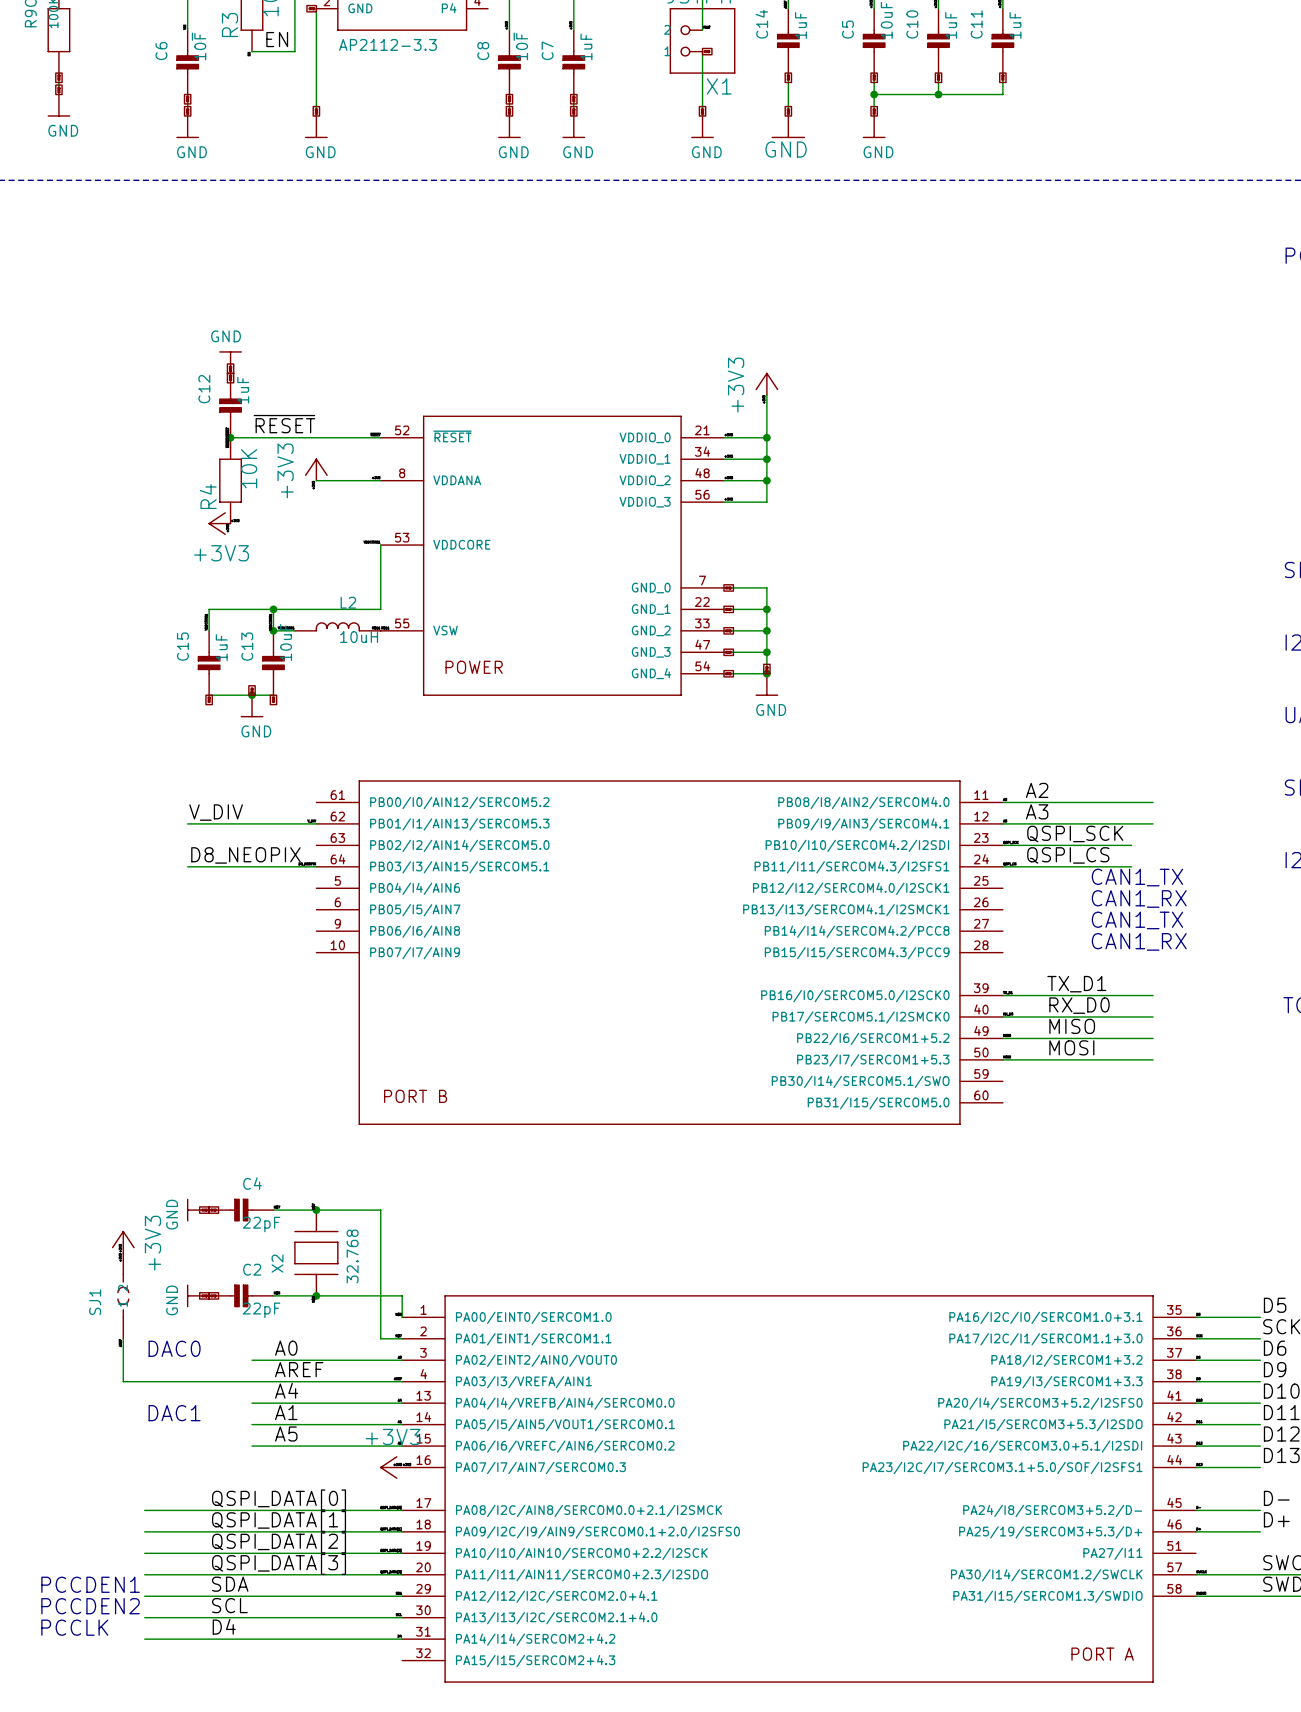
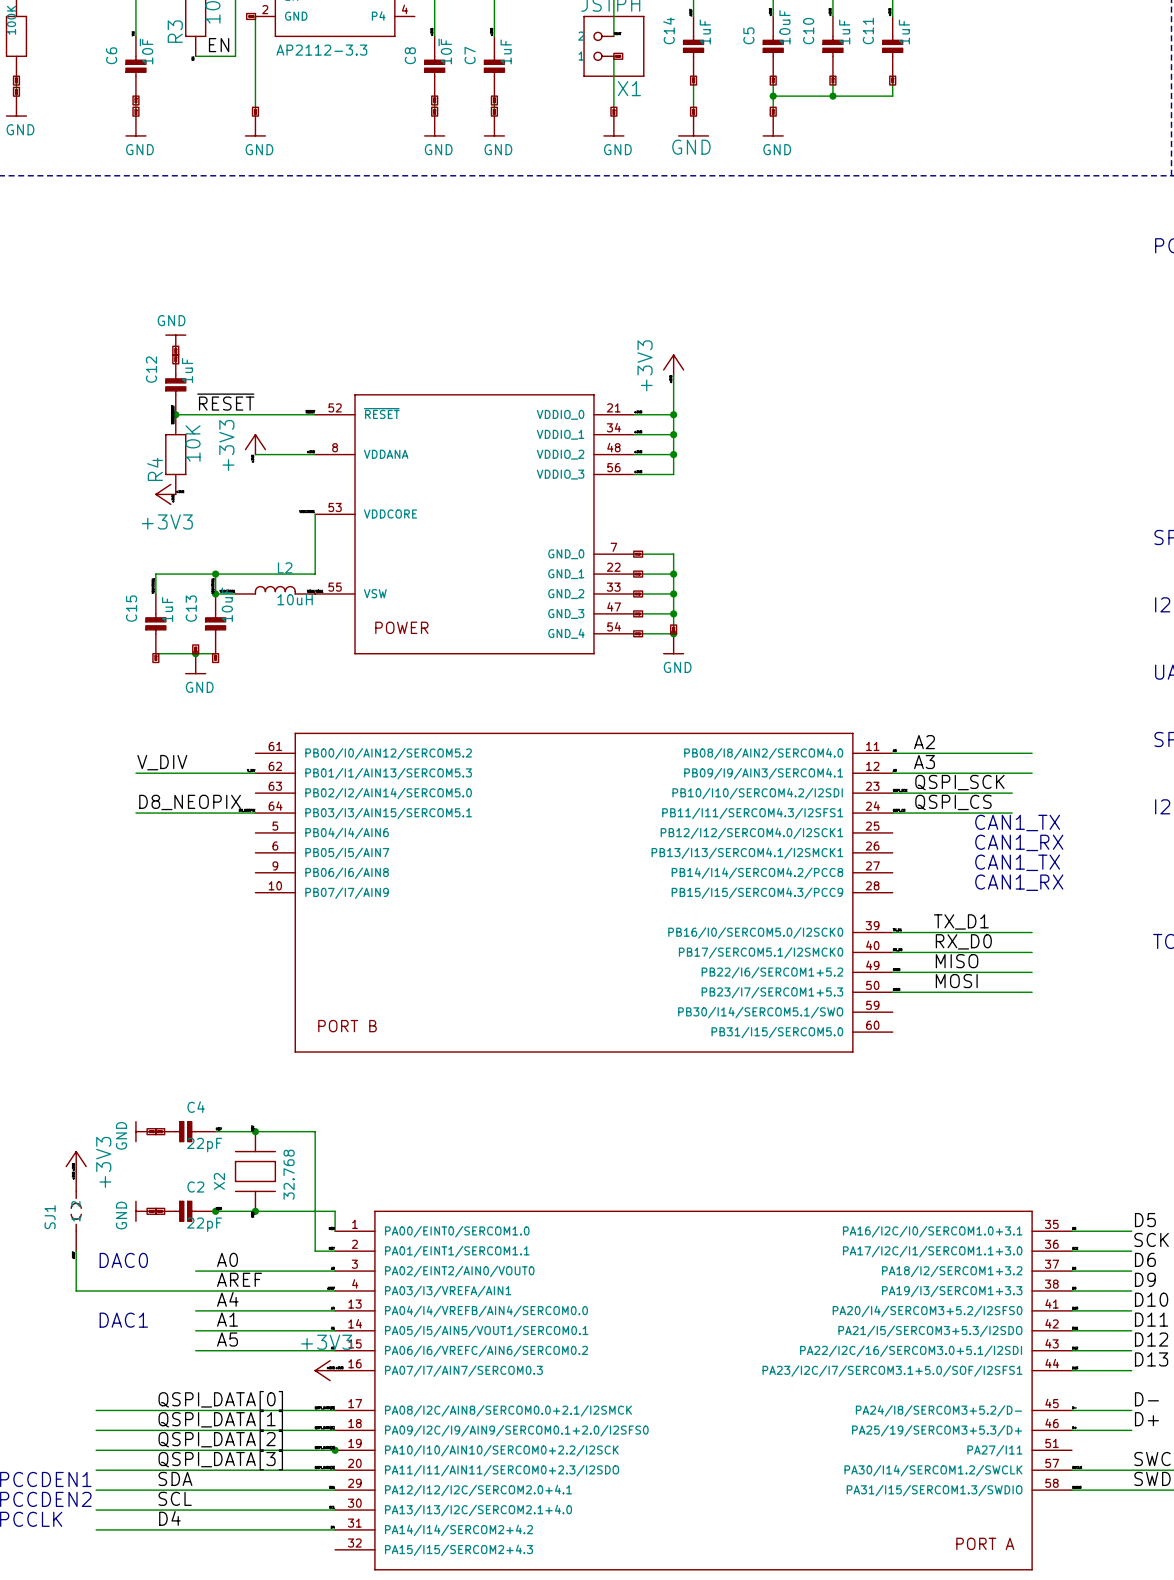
junction: none -> (215, 1211)
junction: none -> (335, 1450)

